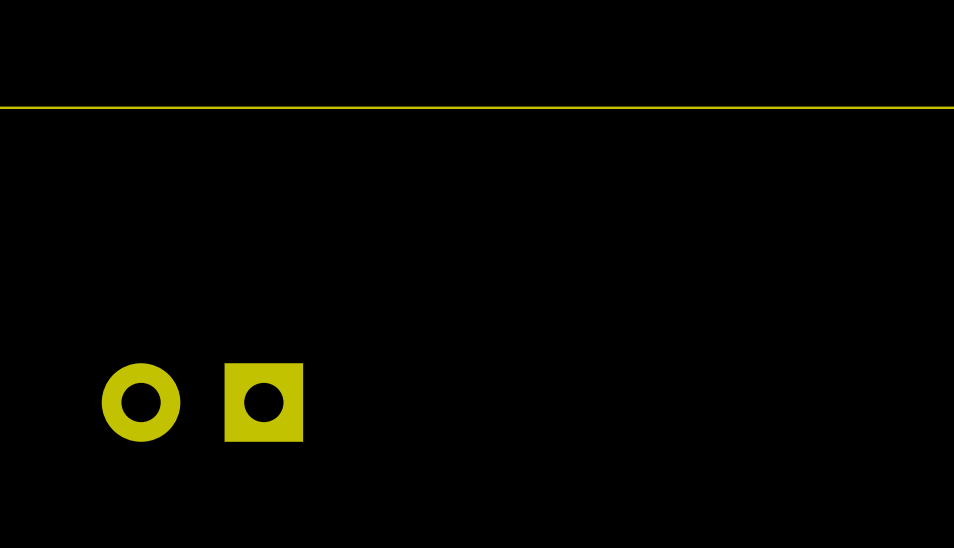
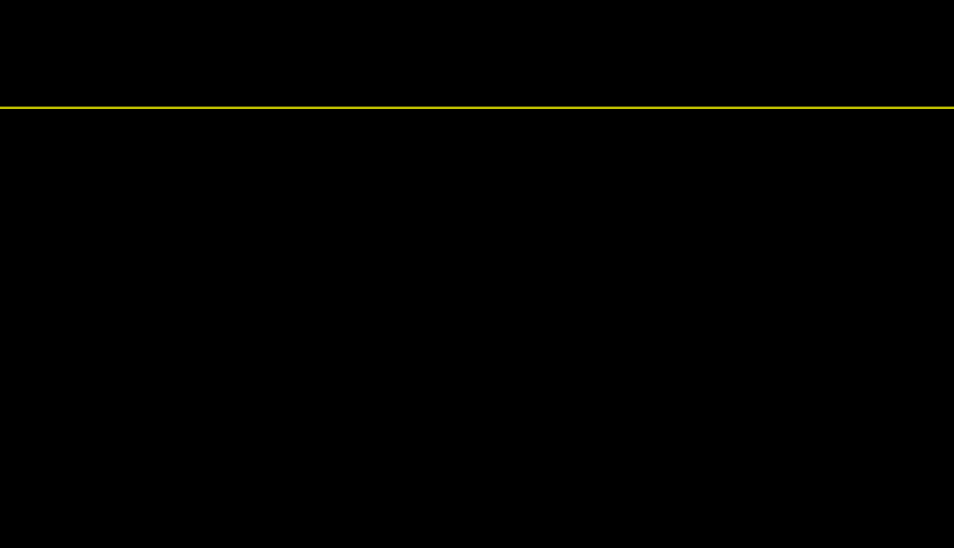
part: (202, 402) -> none

